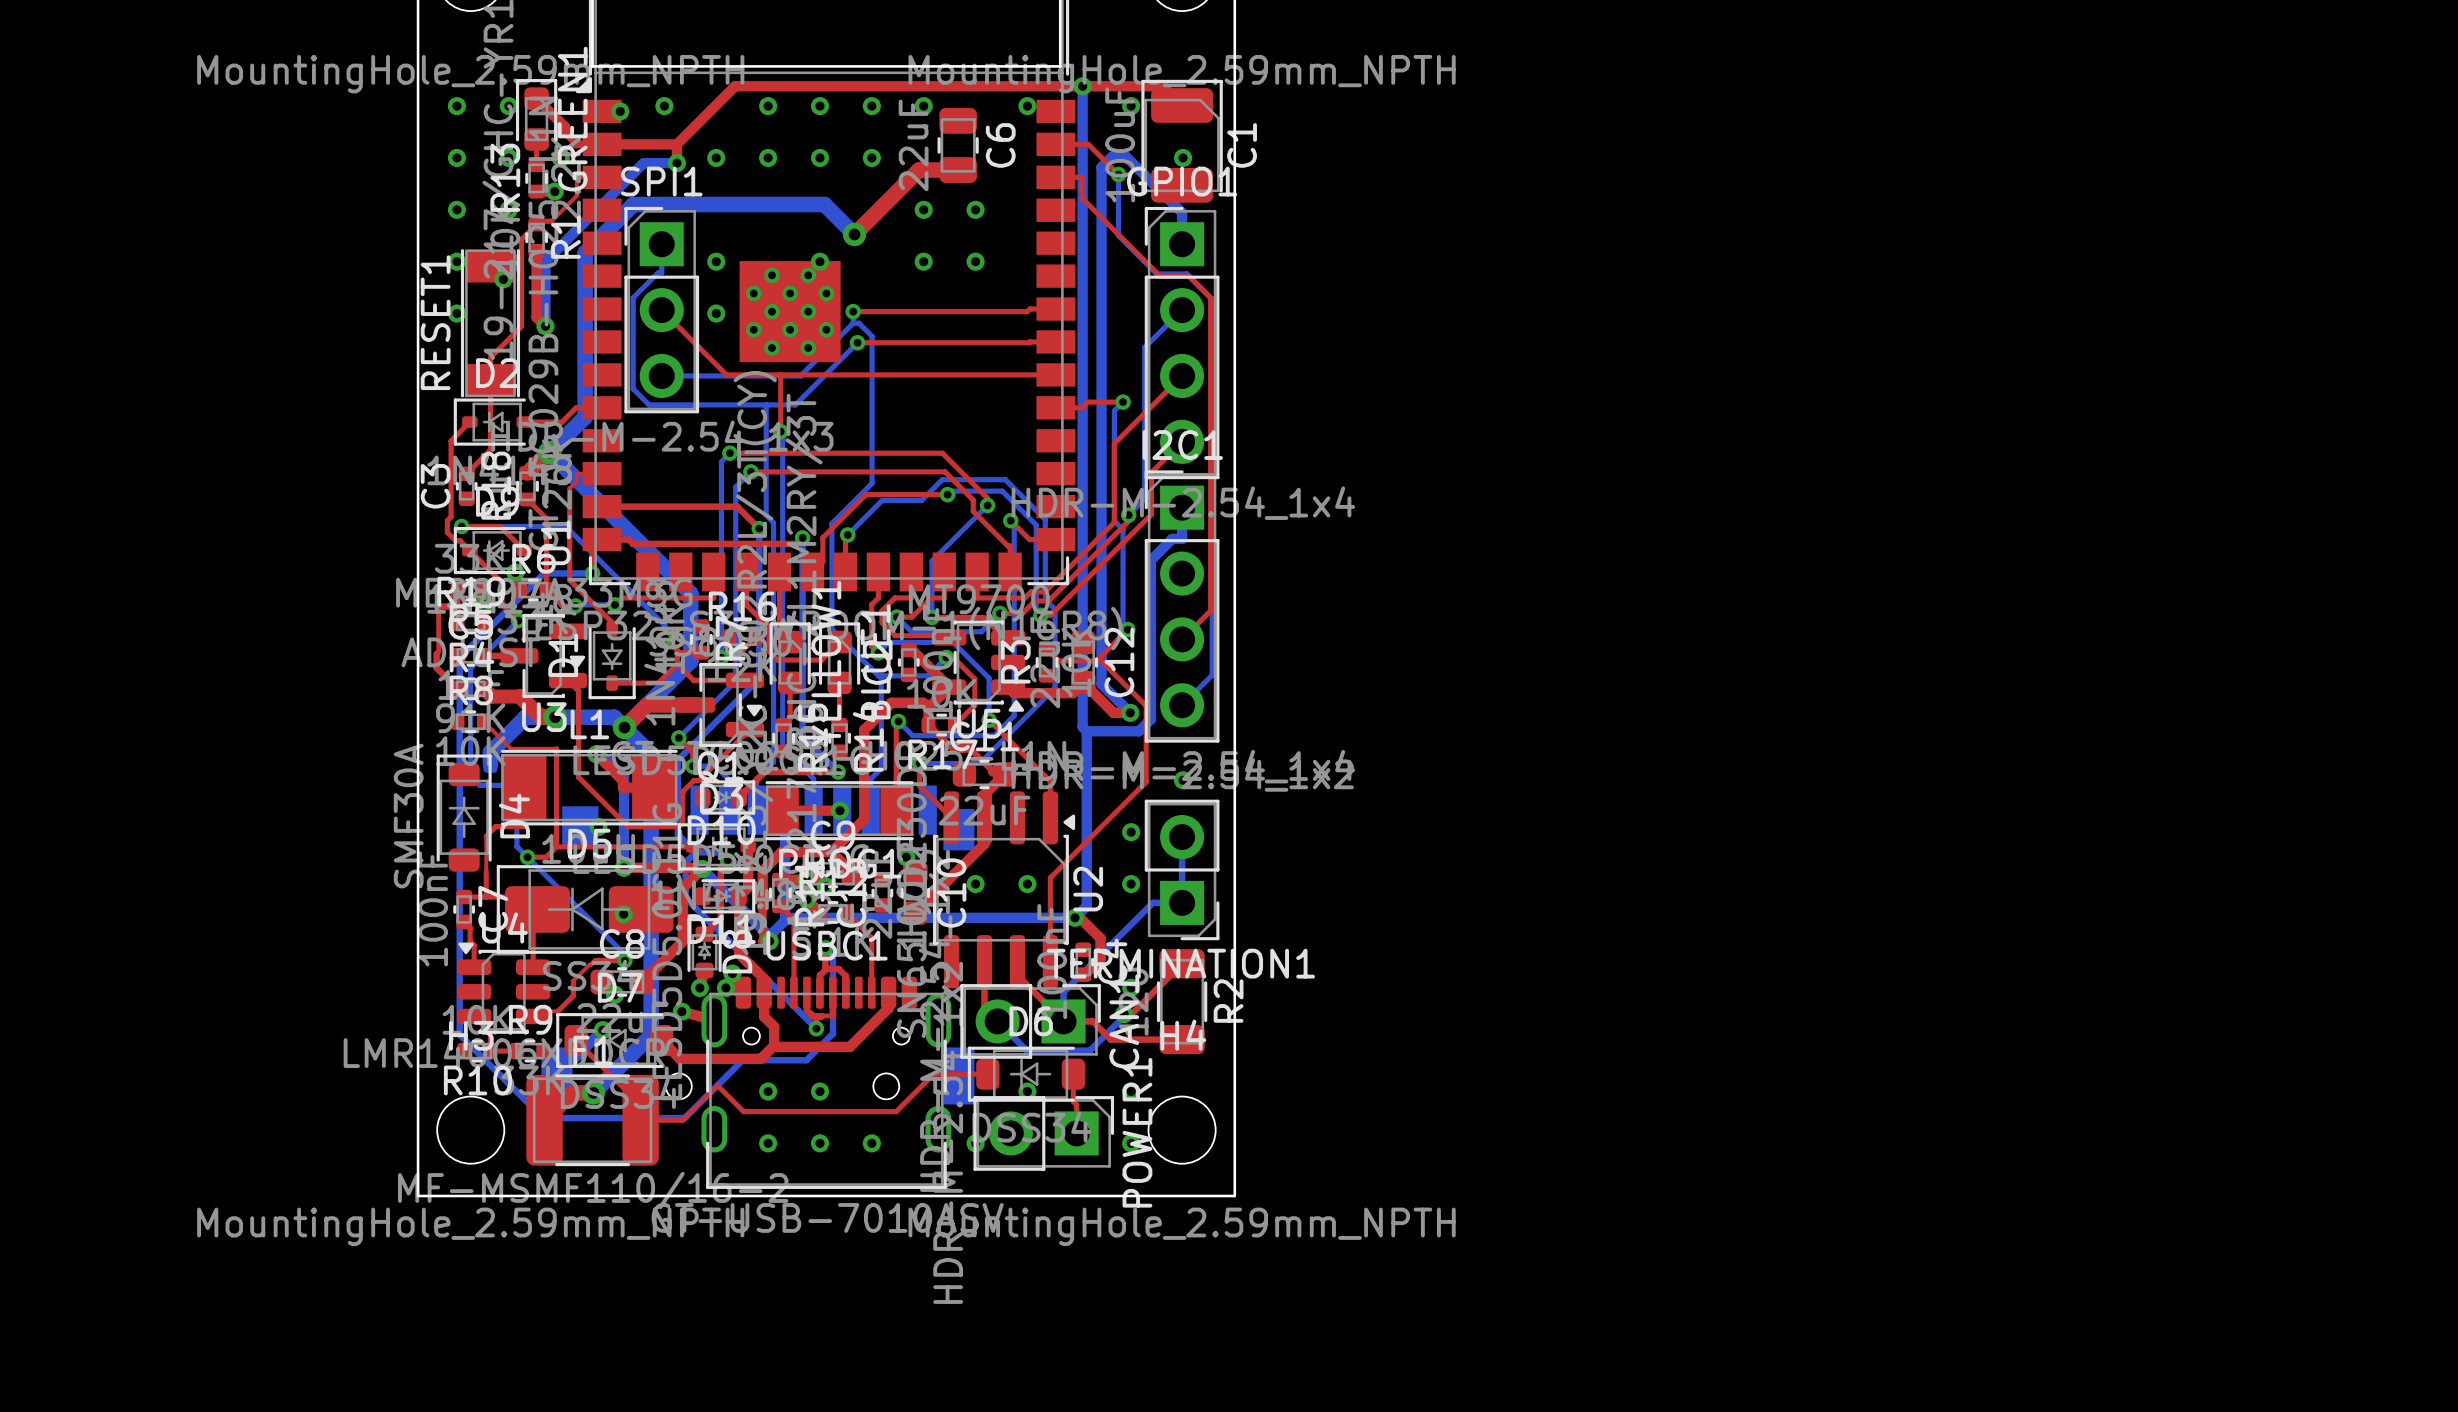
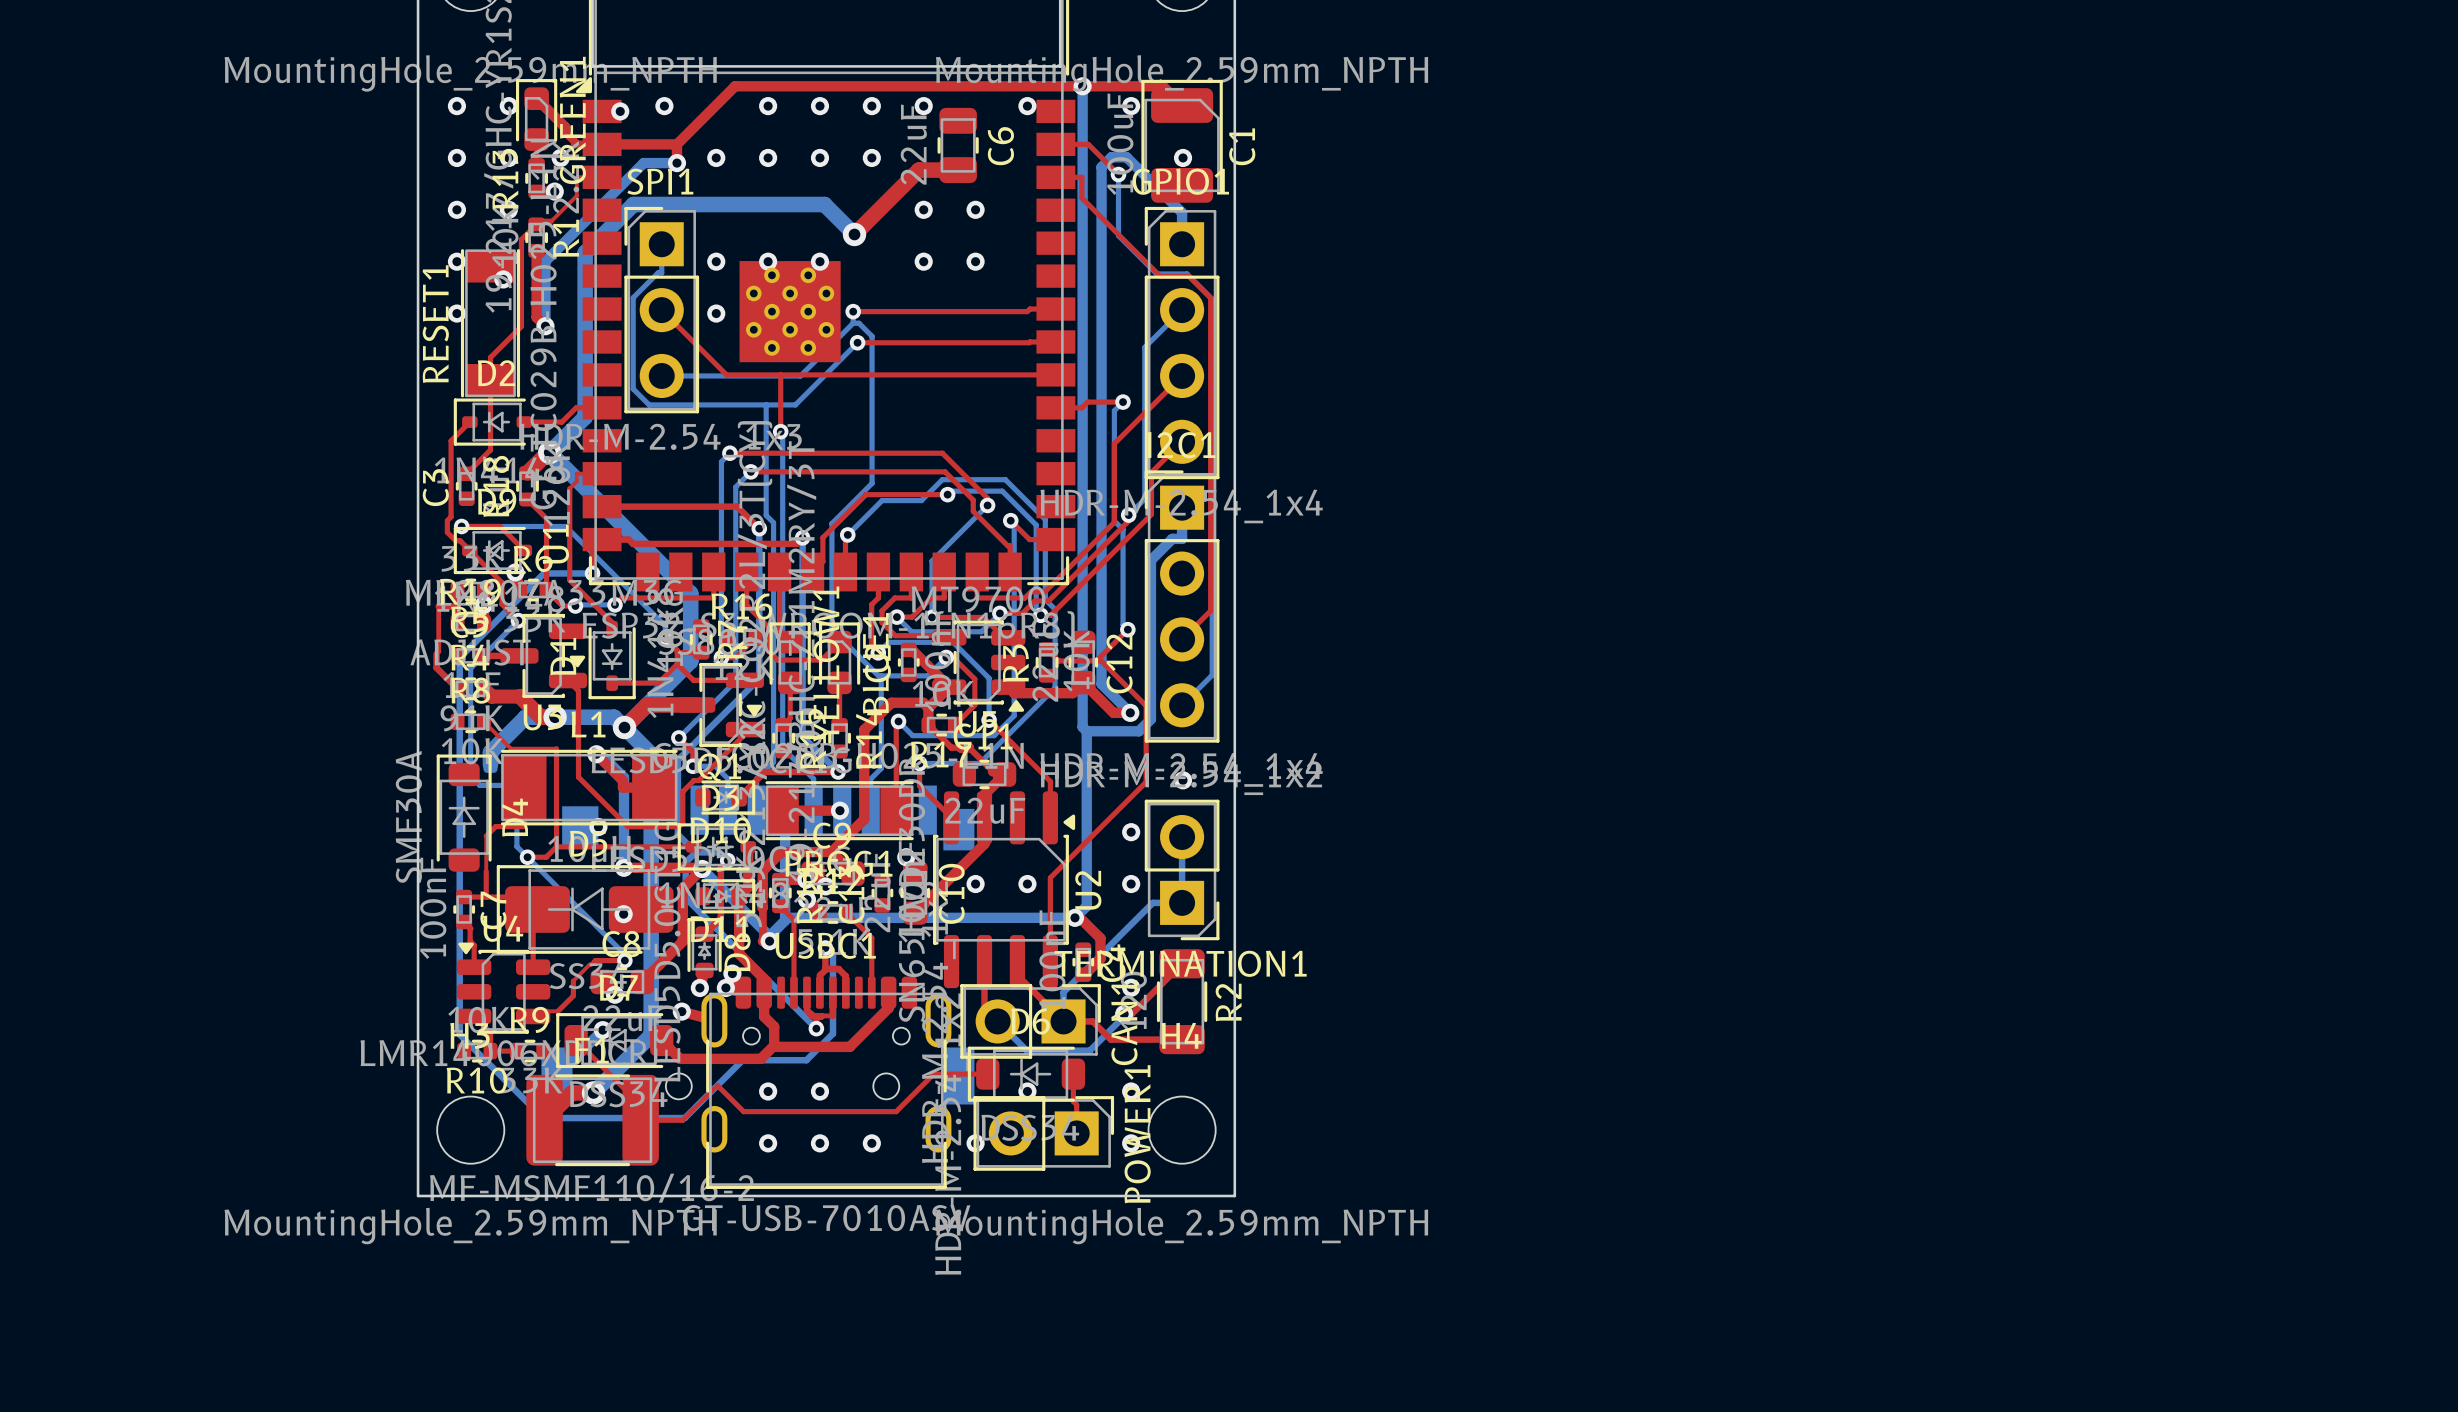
via: none -> (768, 261)

